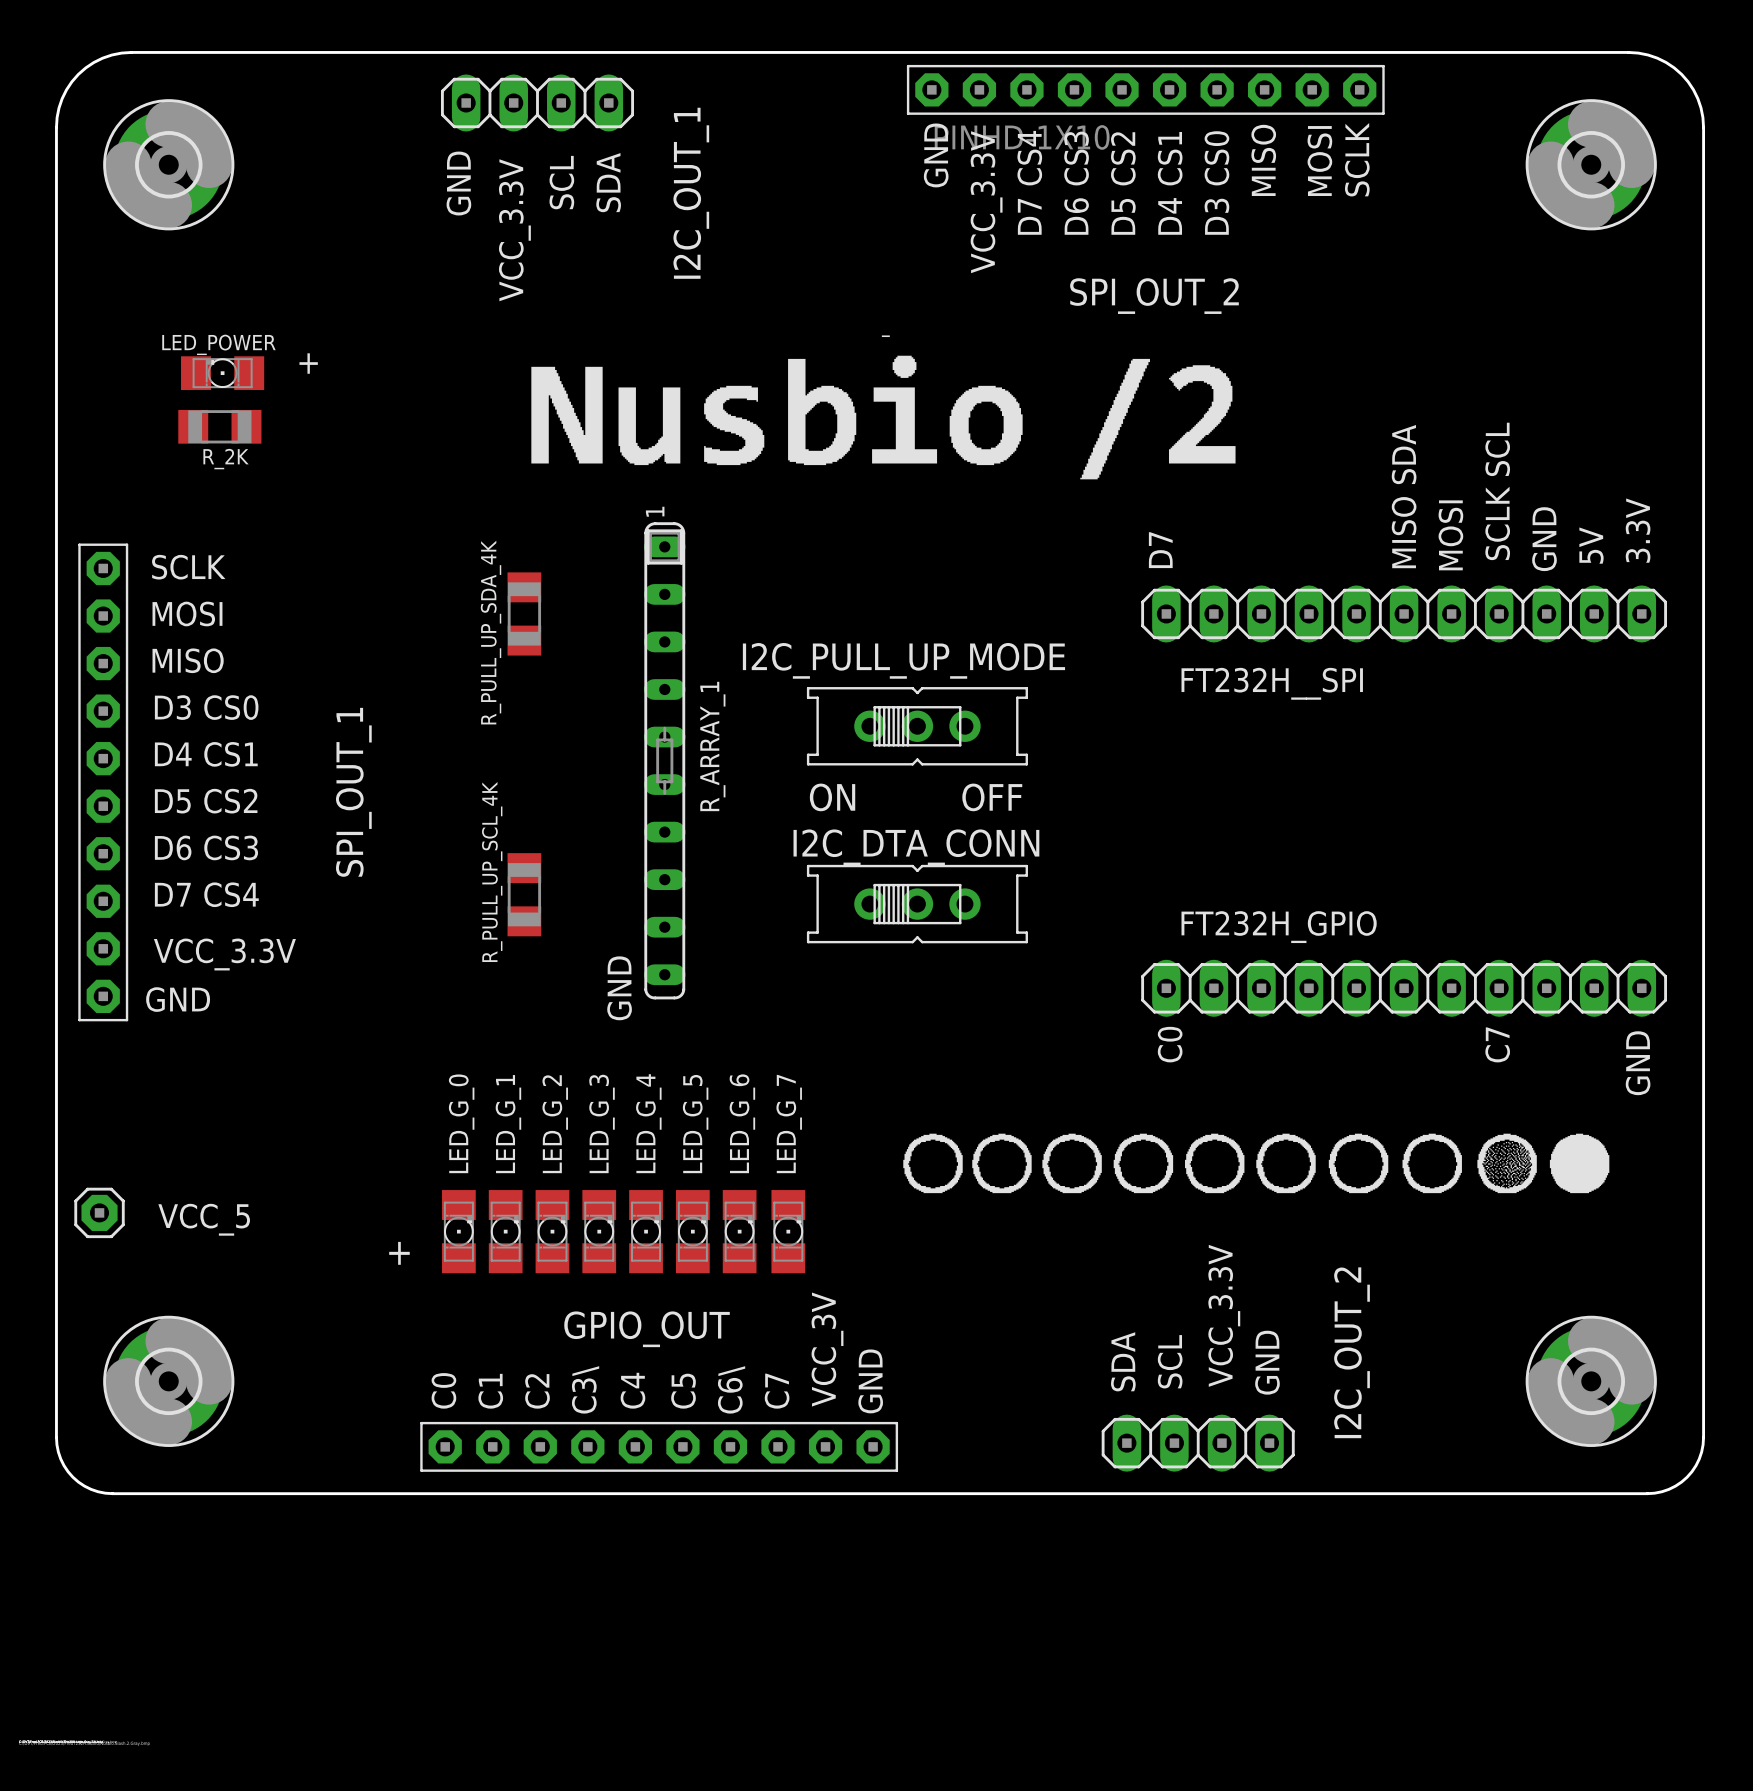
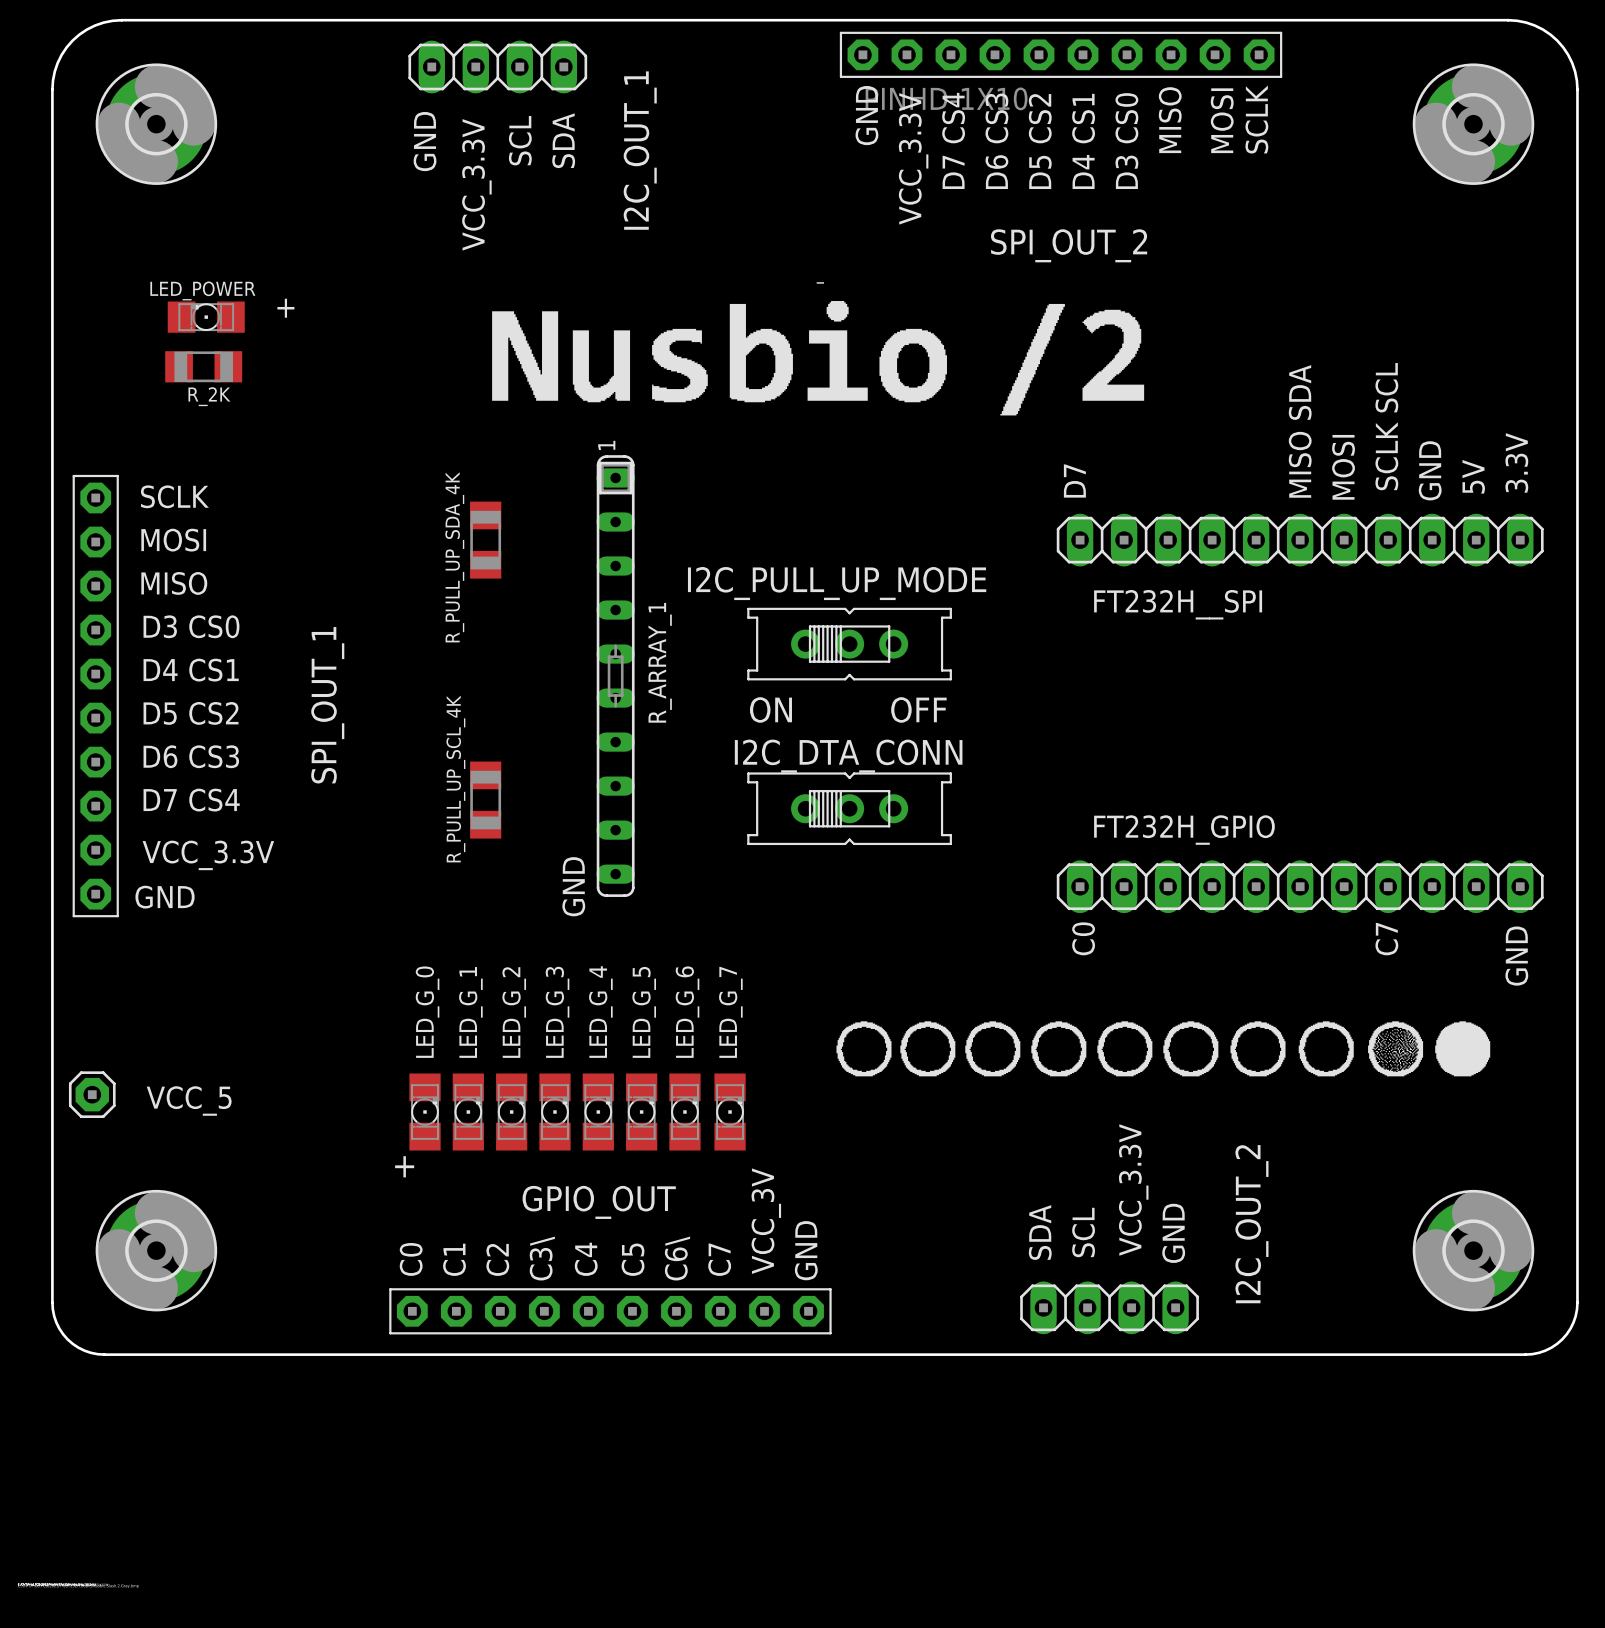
text position: + (399, 1253) -> + (404, 1166)

